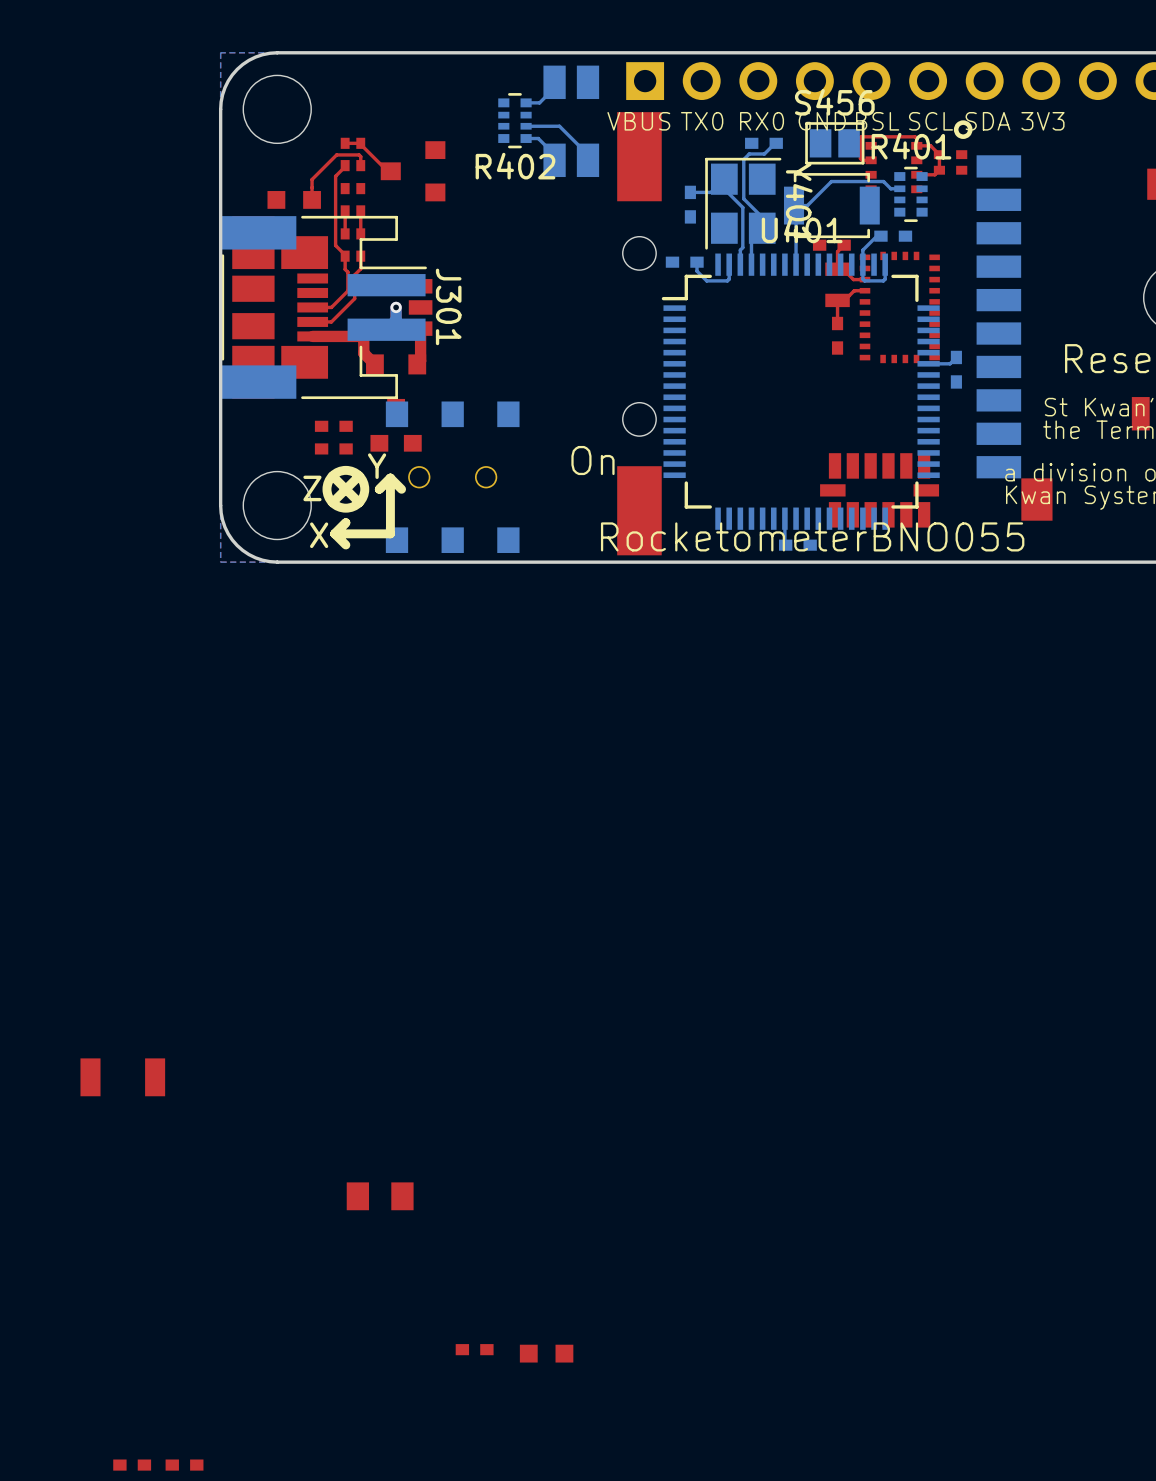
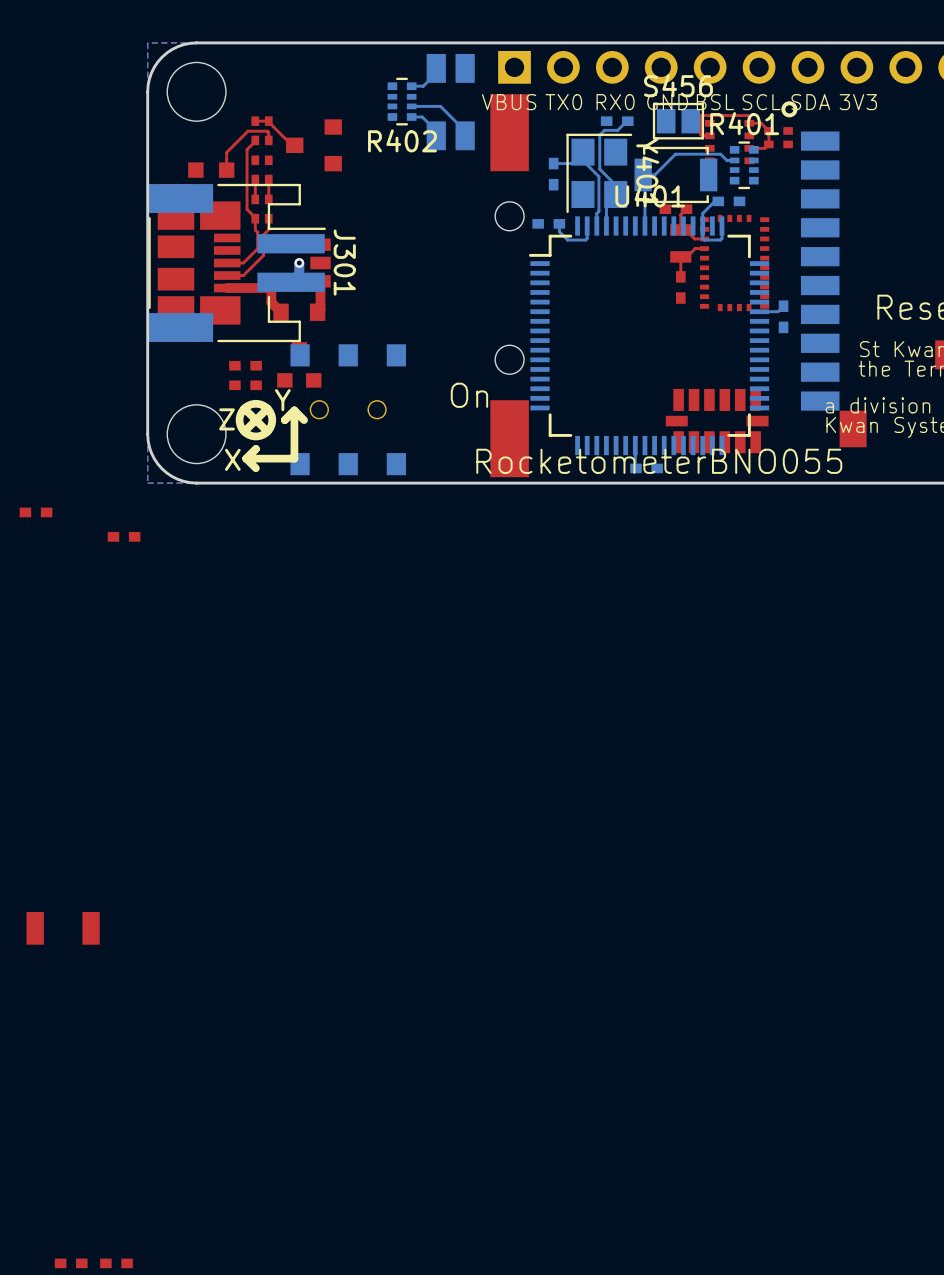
part: none -> (36, 512)
part: none -> (124, 536)
part: (380, 1196) -> none
part: (474, 1349) -> none
part: (546, 1353) -> none

